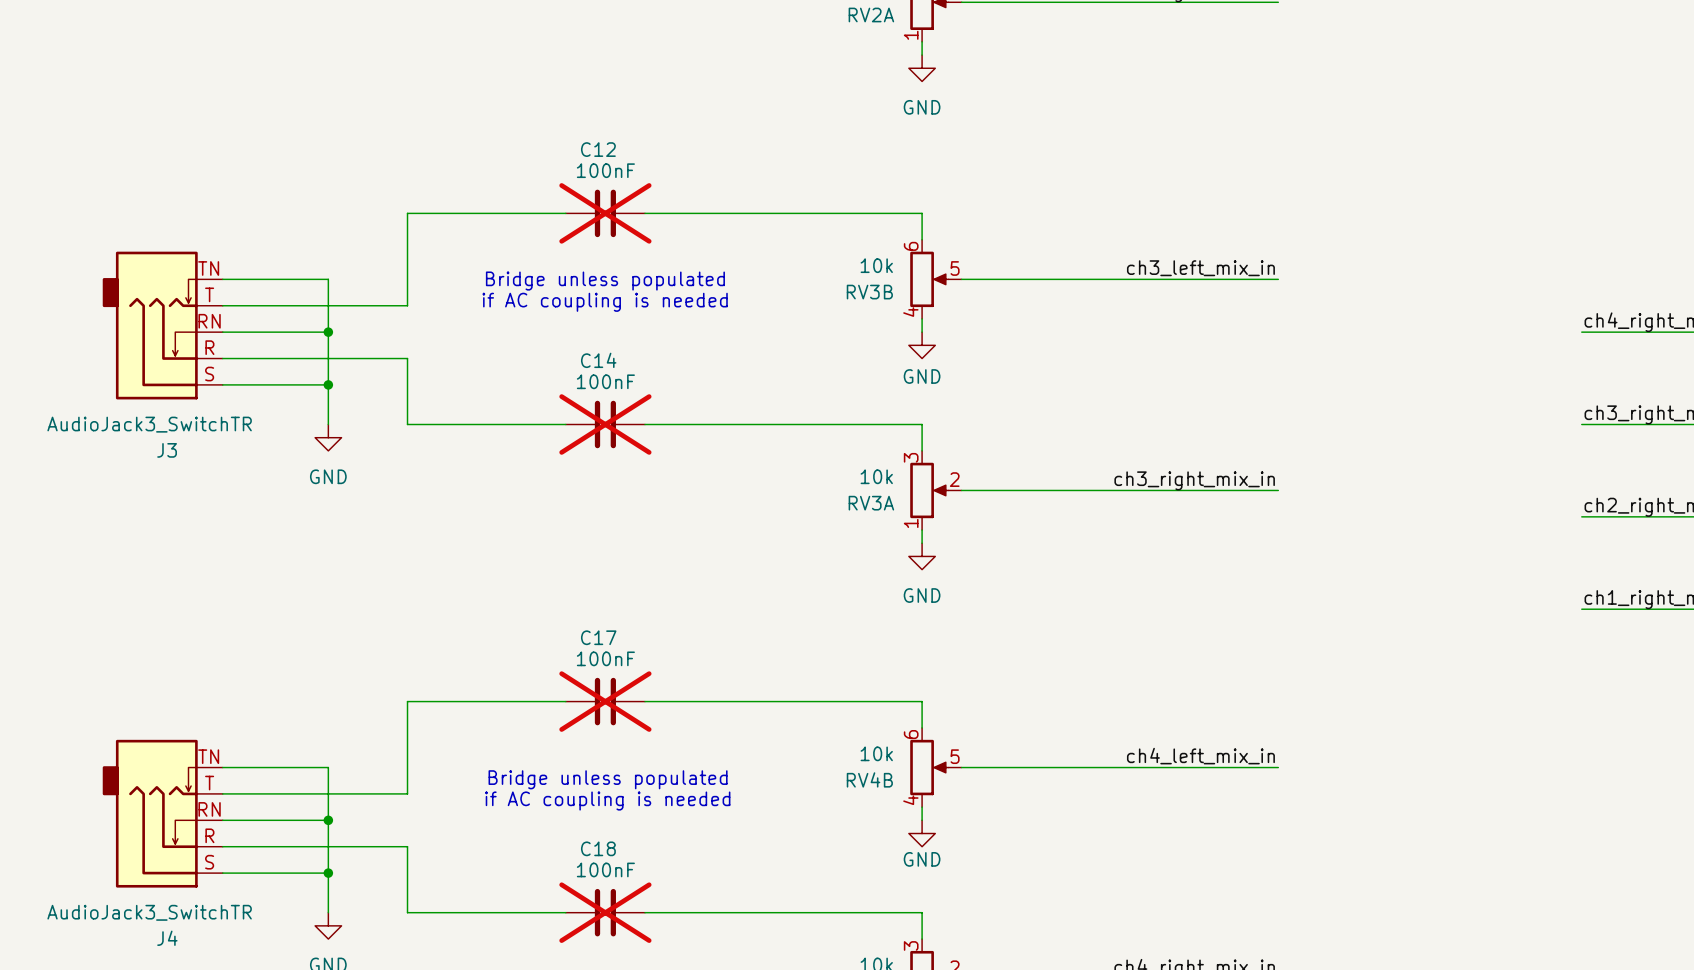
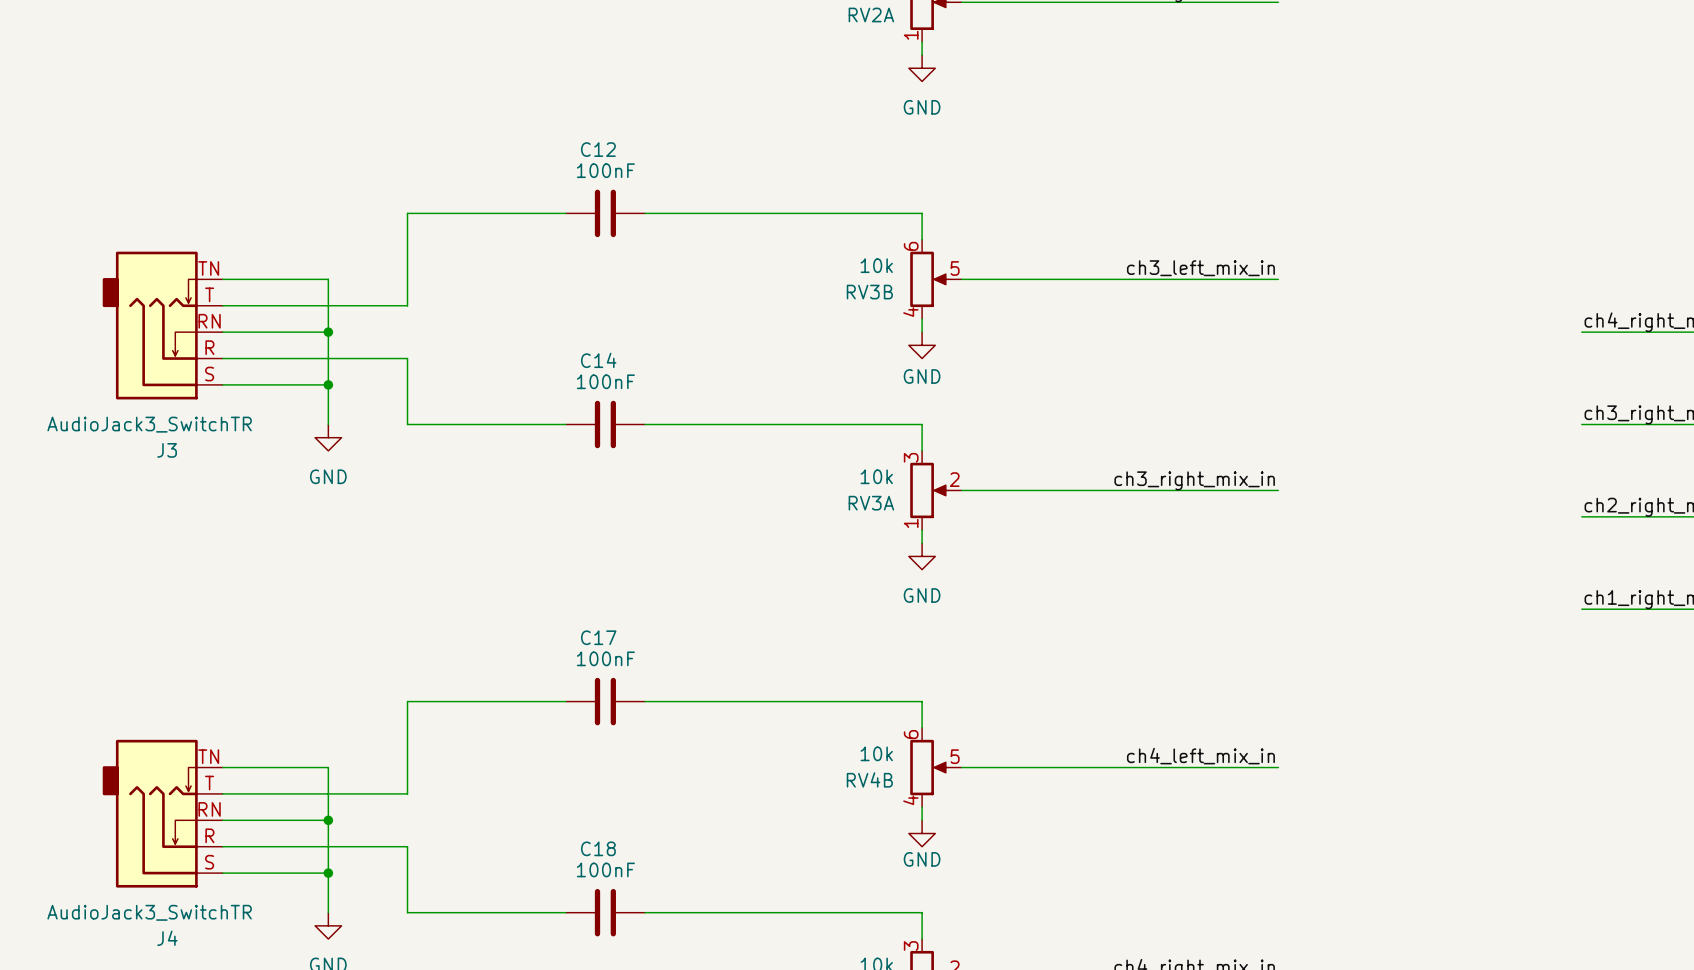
C12 do-not-place cross: (605, 213) -> none
text: Bridge unless populated (605, 281) -> none
text: if AC coupling is needed (605, 302) -> none
C14 do-not-place cross: (605, 424) -> none
C17 do-not-place cross: (605, 701) -> none
text: Bridge unless populated (608, 779) -> none
text: if AC coupling is needed (607, 801) -> none
C18 do-not-place cross: (605, 912) -> none

